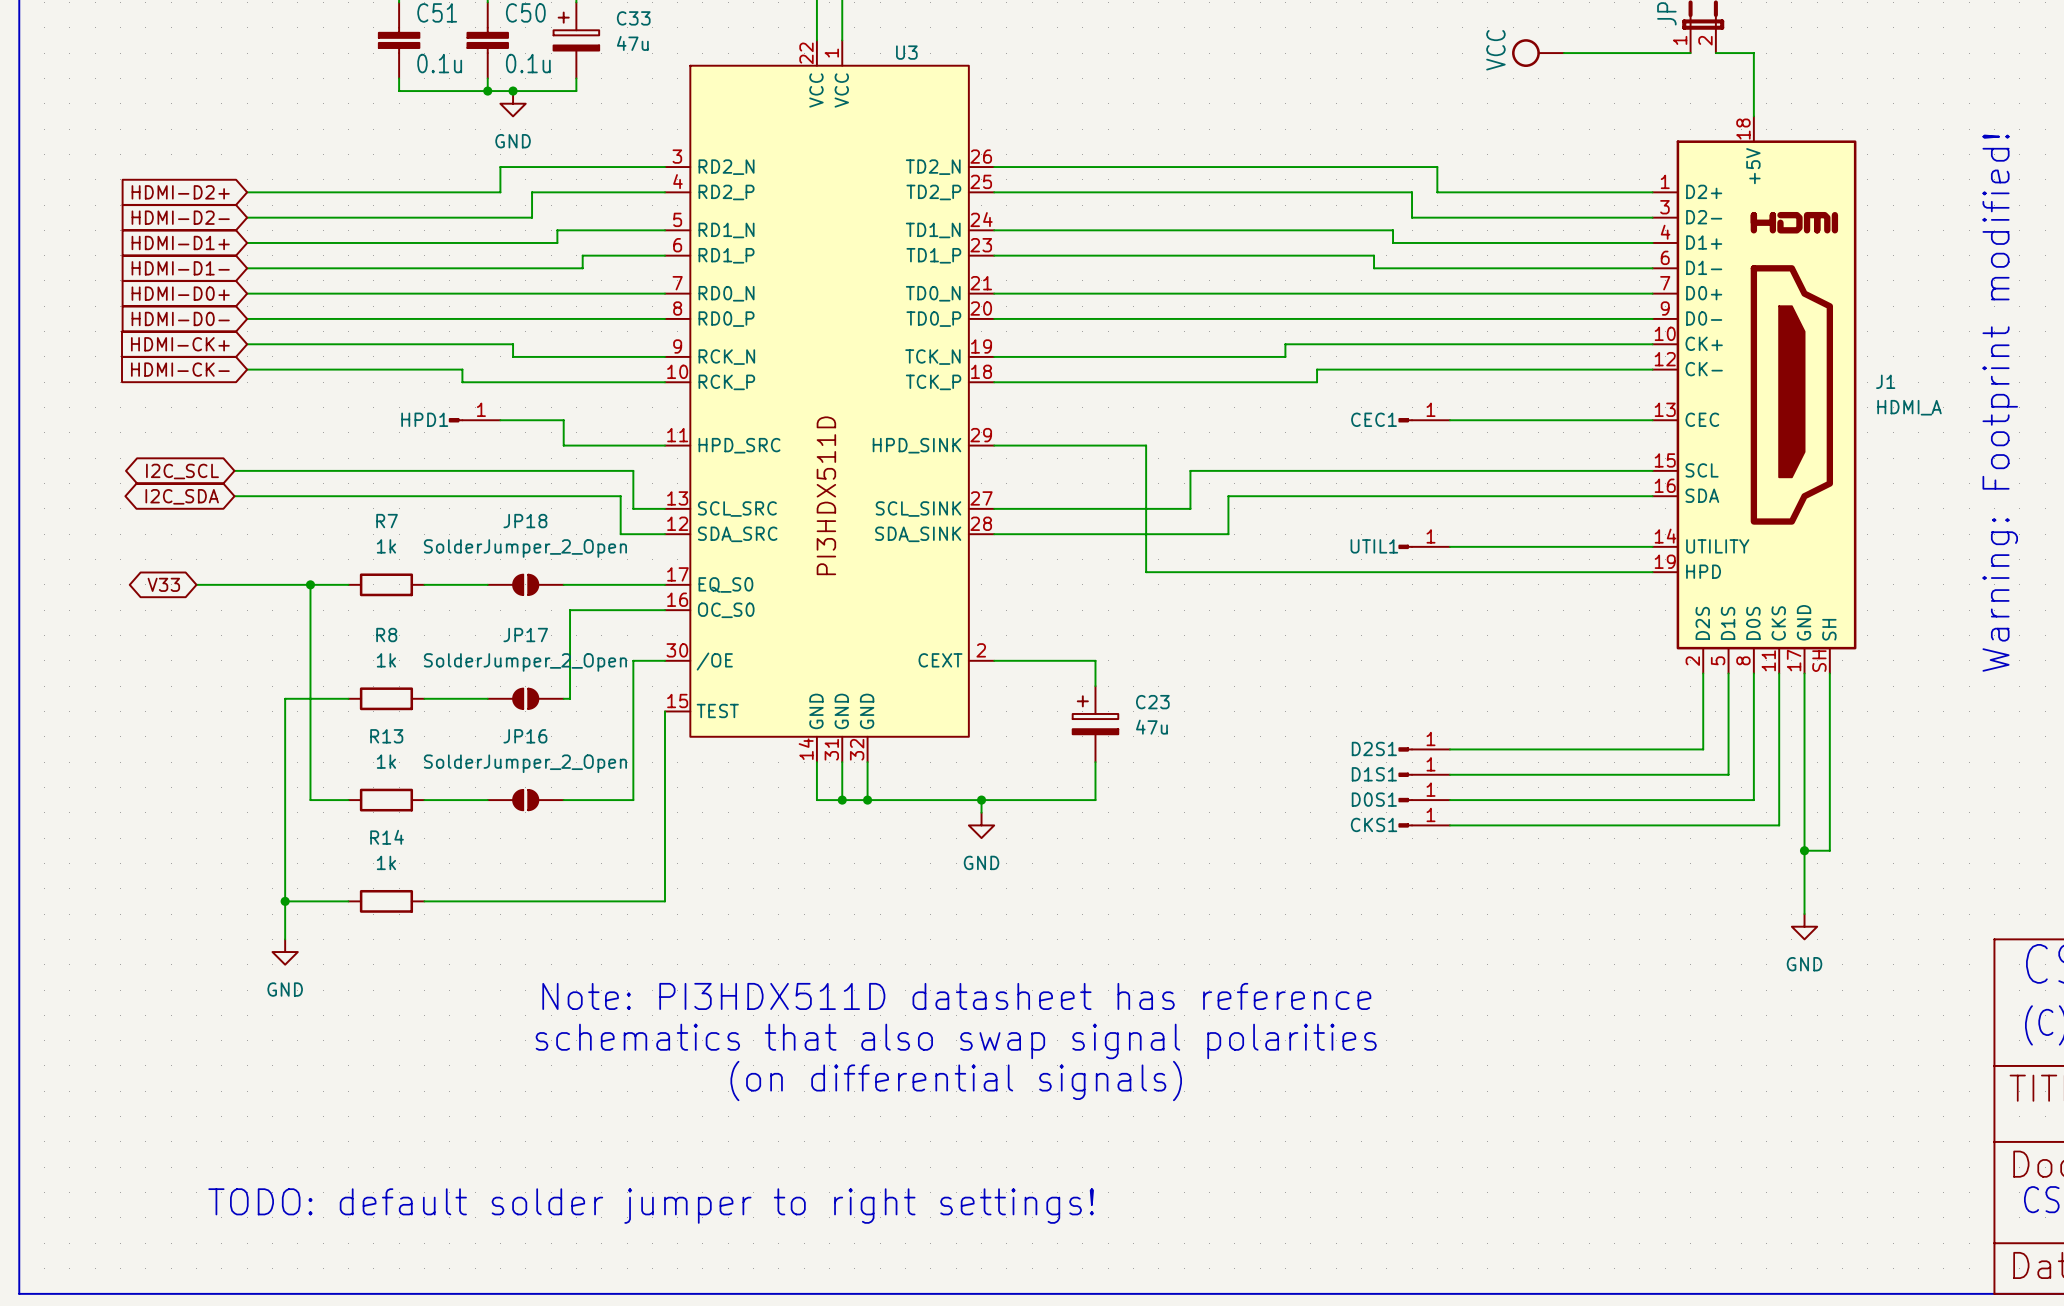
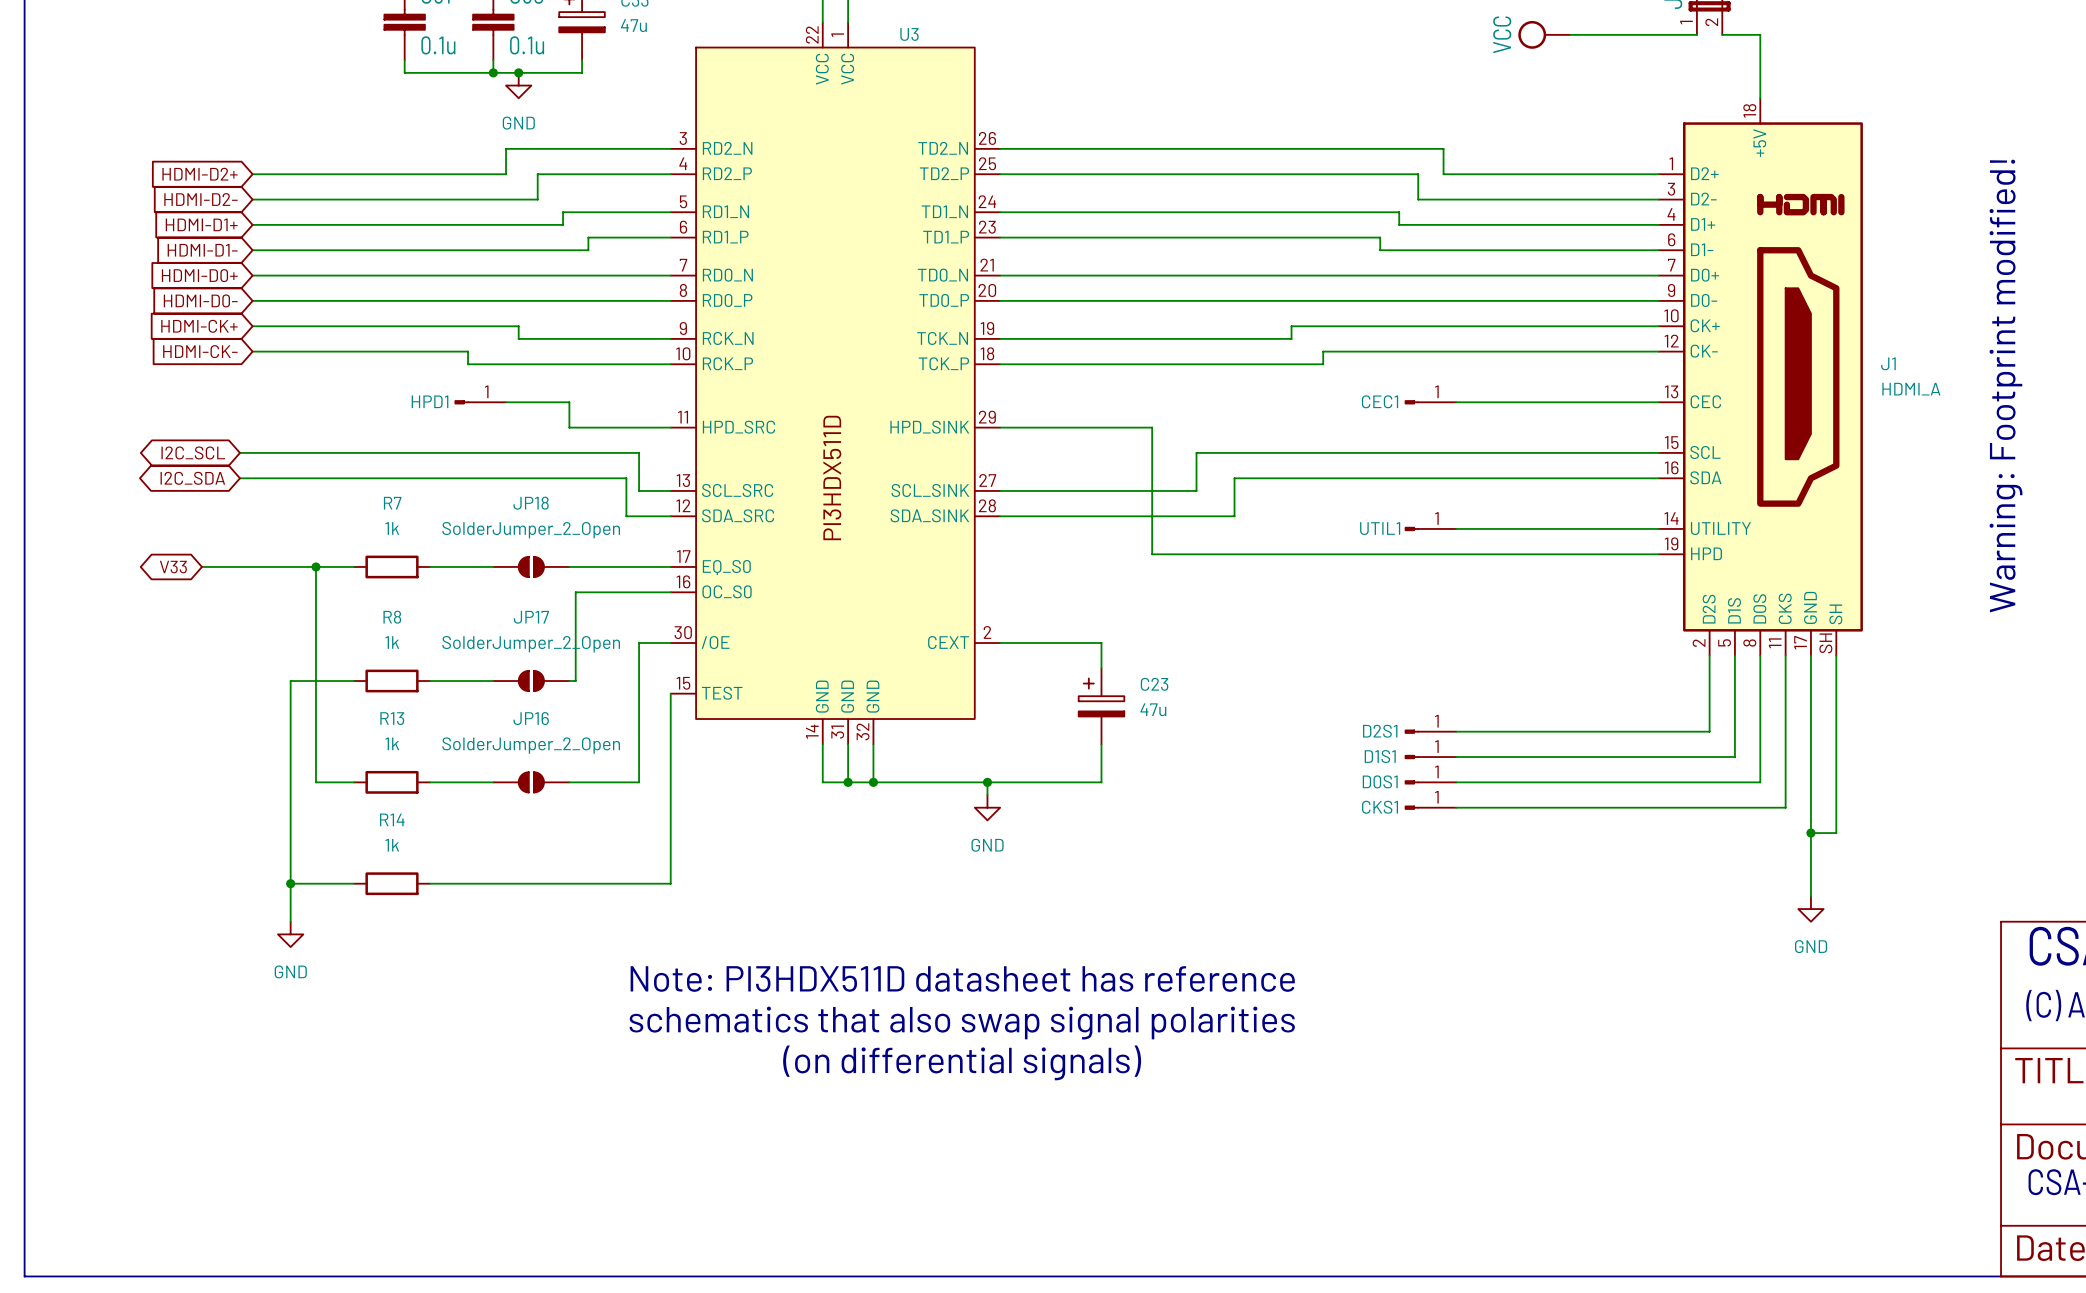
text: TODO: default solder jumper to right settings! (651, 1206) -> none

